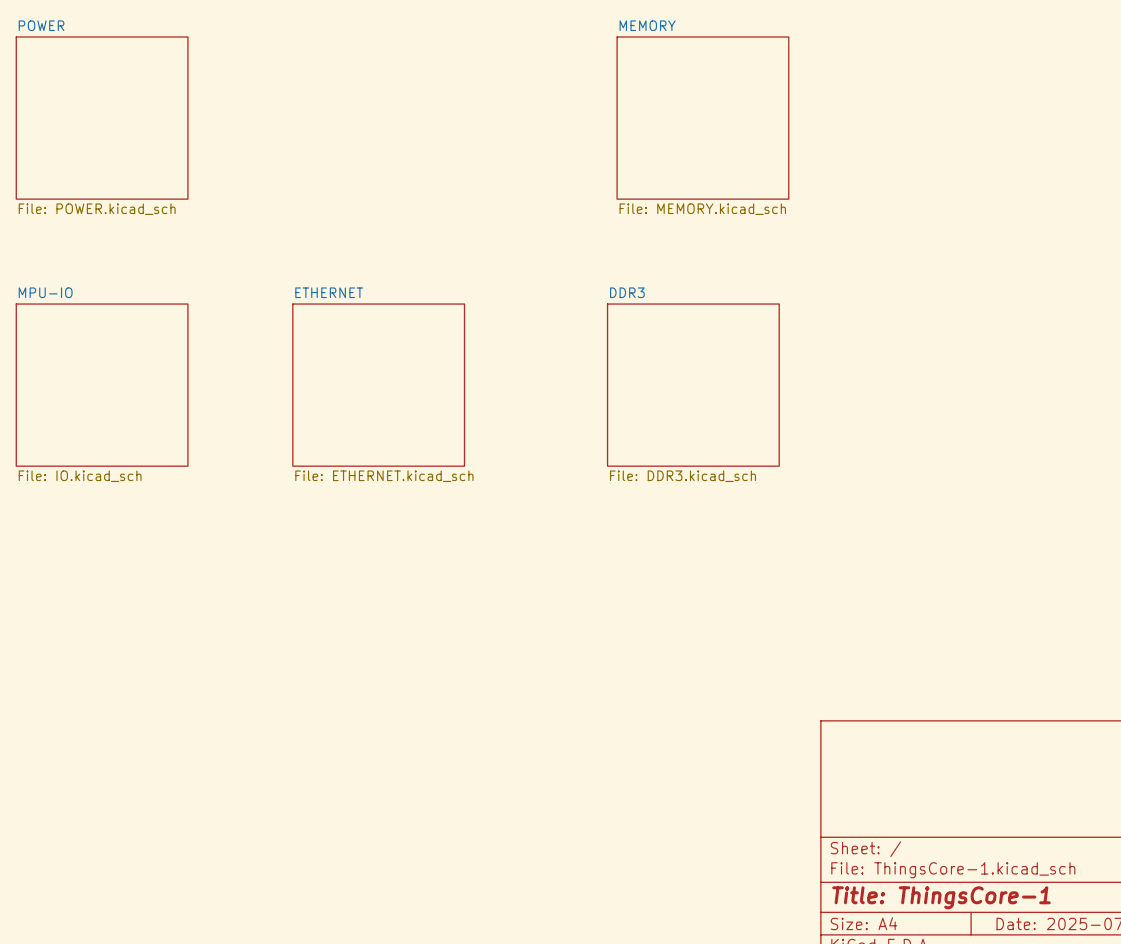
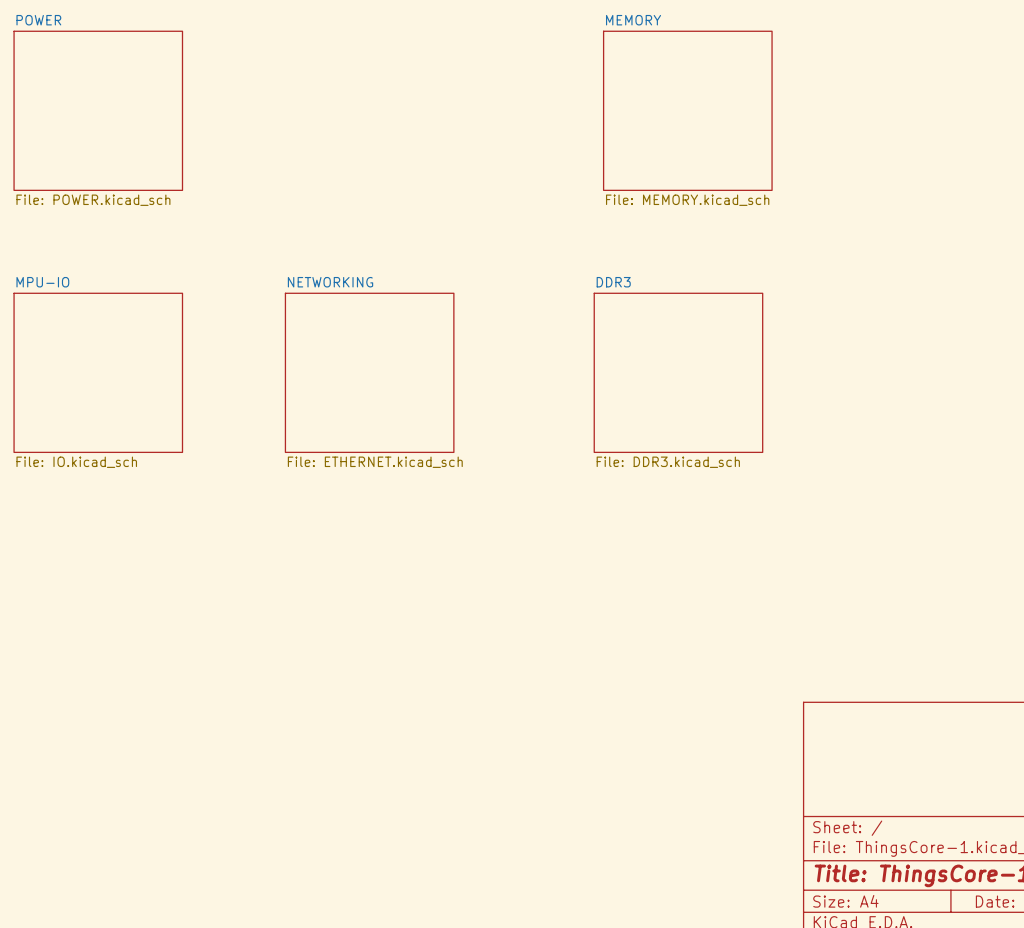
sheet ETHERNET name: ETHERNET (329, 292) -> NETWORKING (330, 282)

